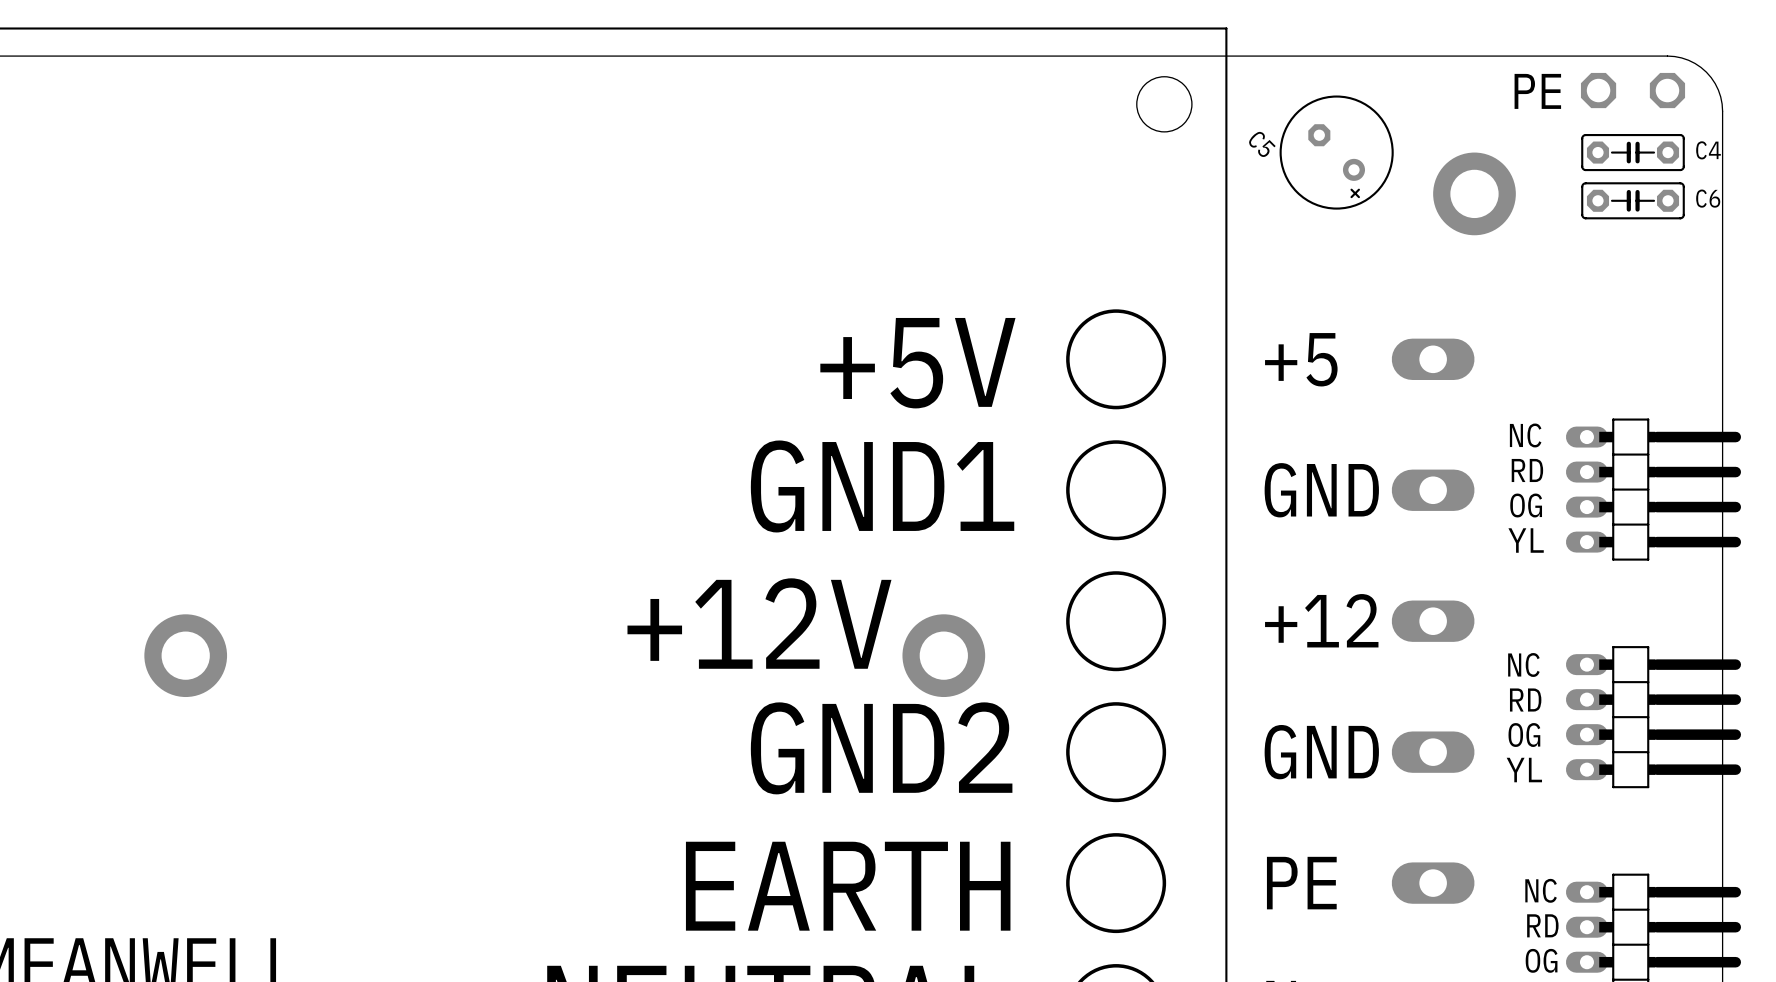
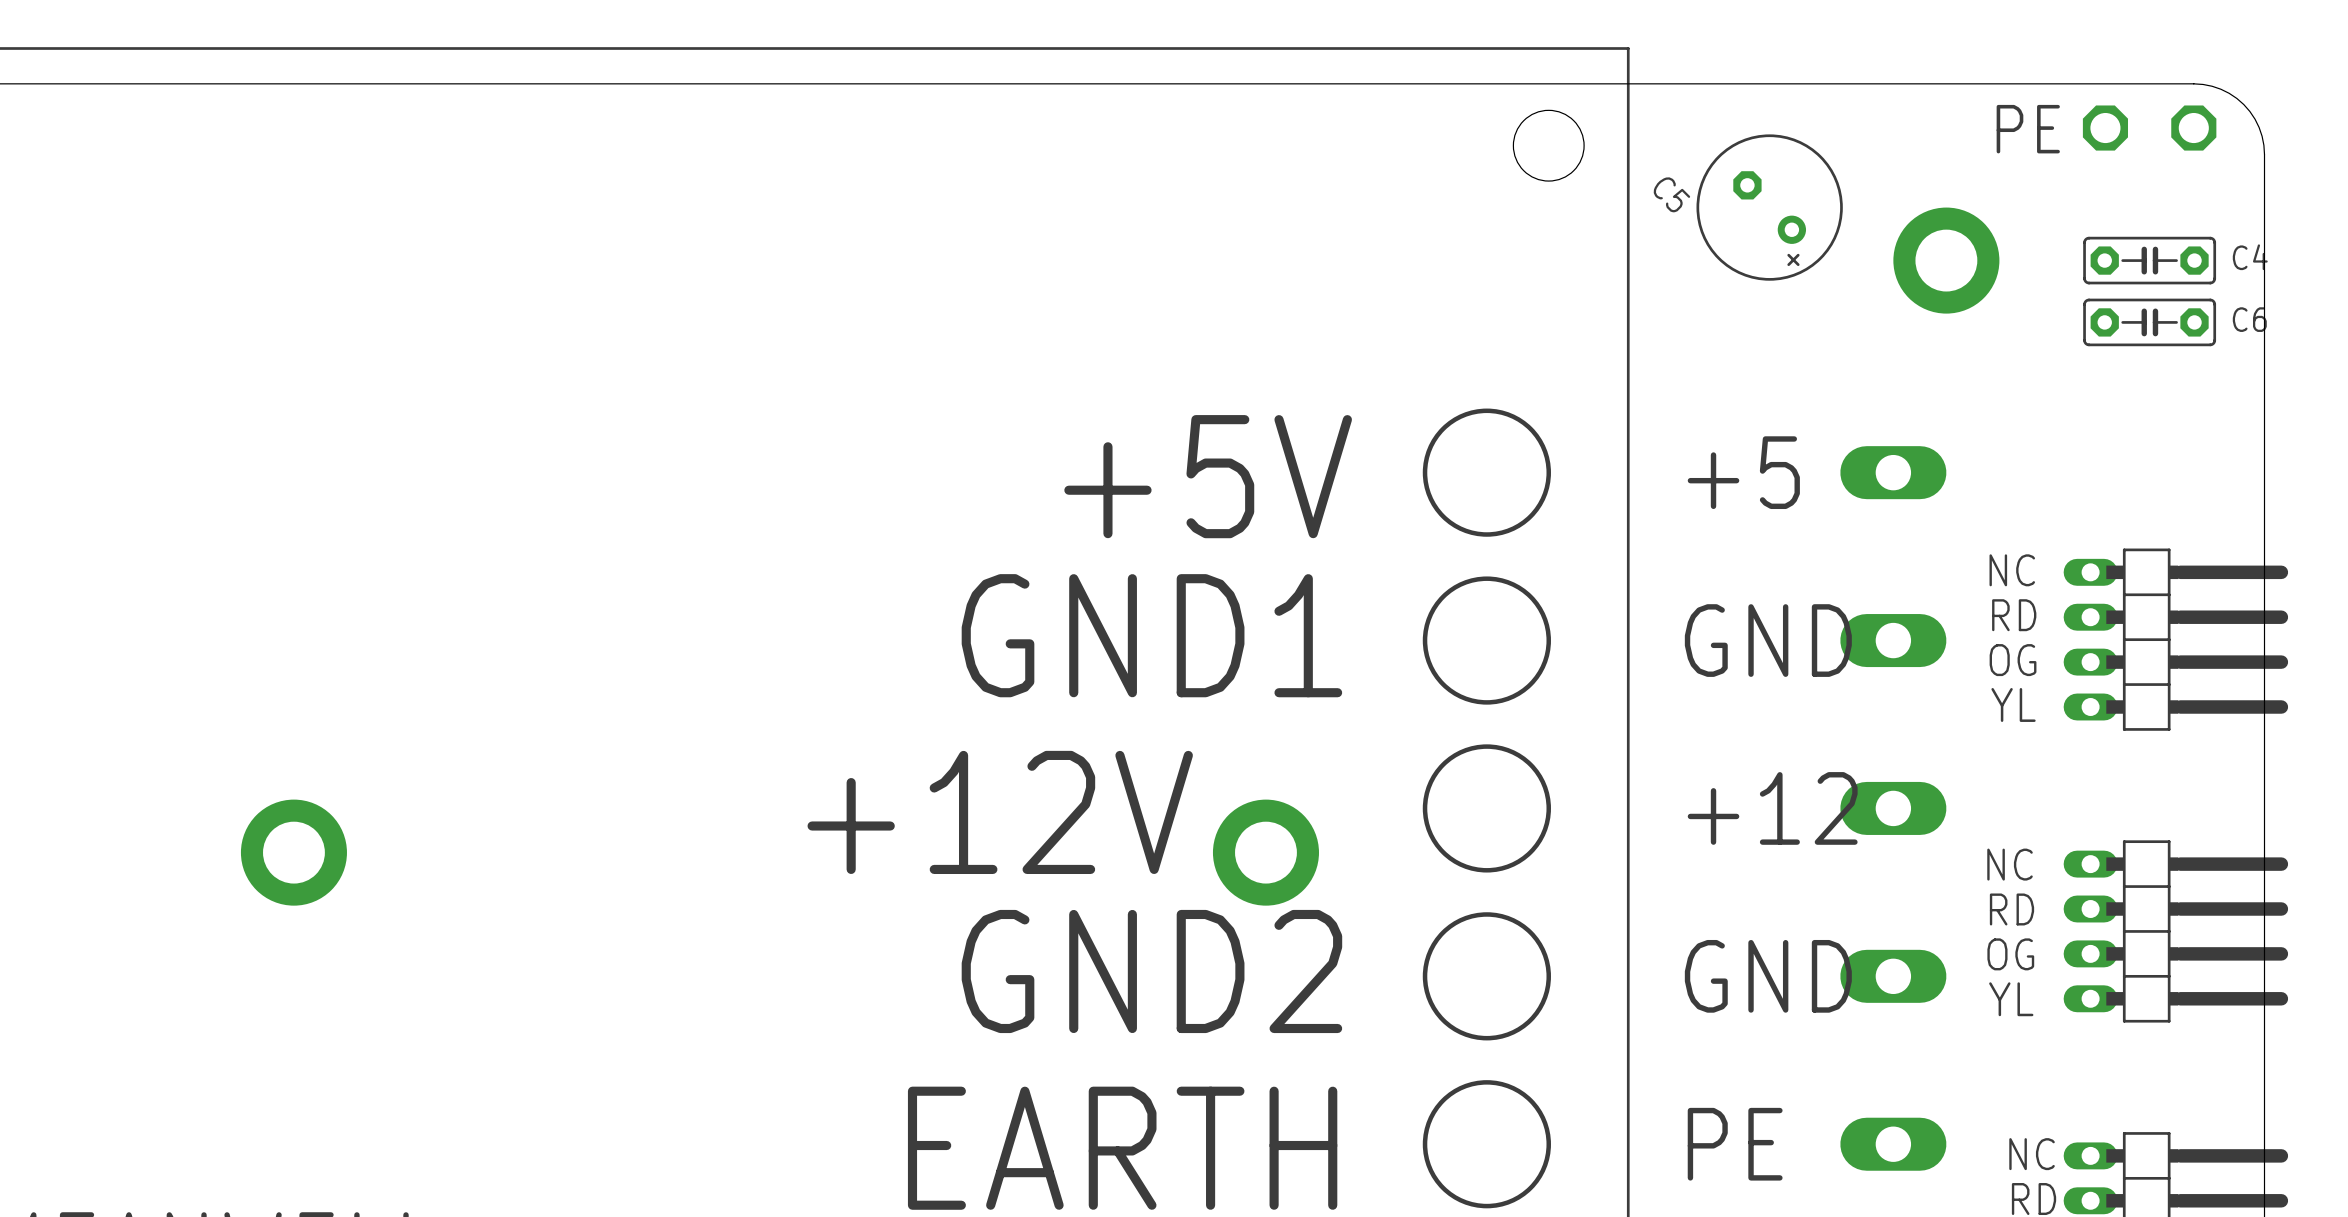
C4 position: (1633, 152) -> (2149, 260)
C6 position: (1633, 200) -> (2149, 322)

